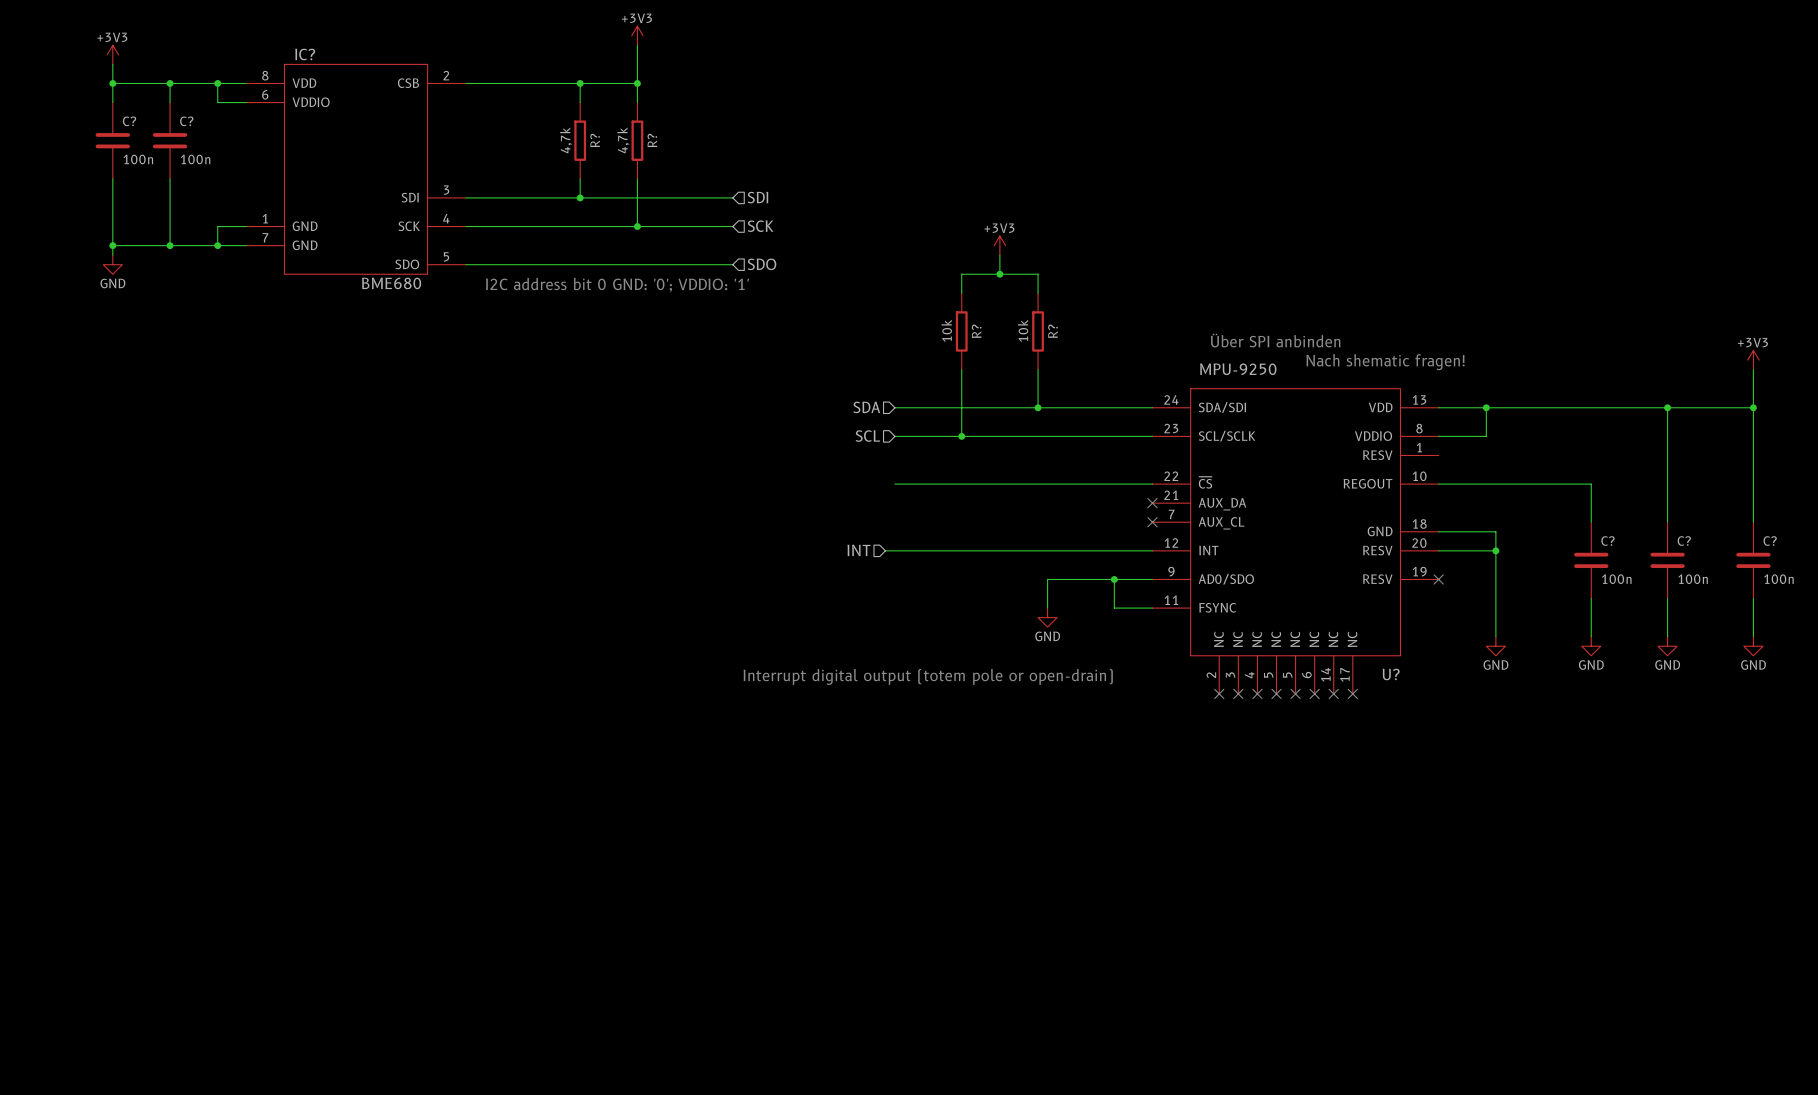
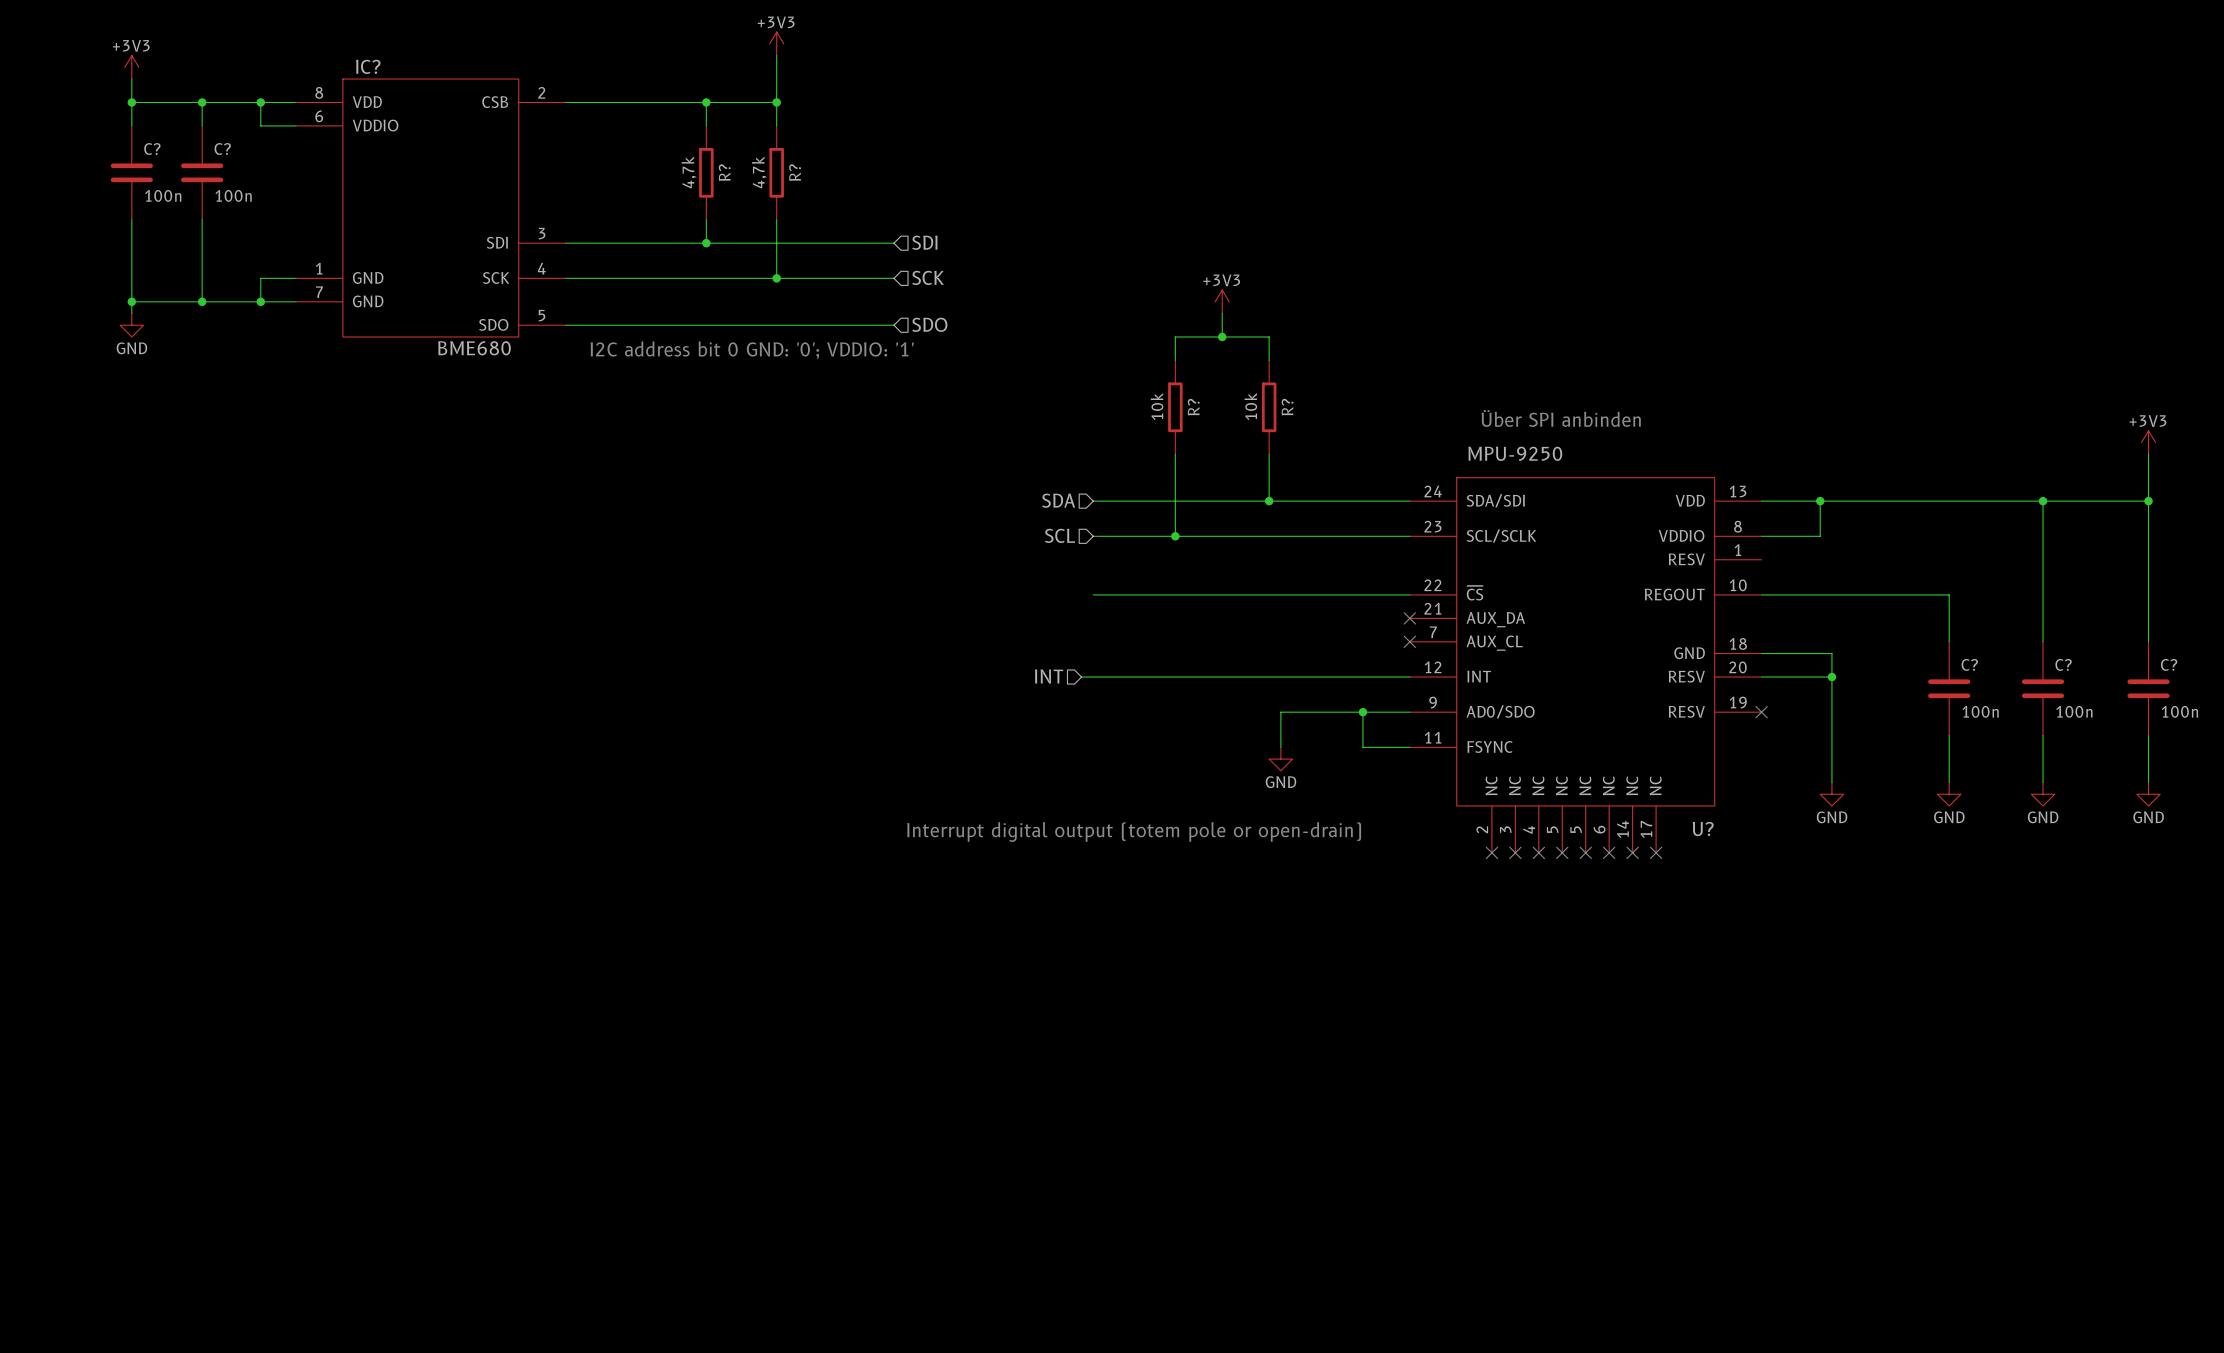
text: Nach shematic fragen! (1385, 362) -> none

